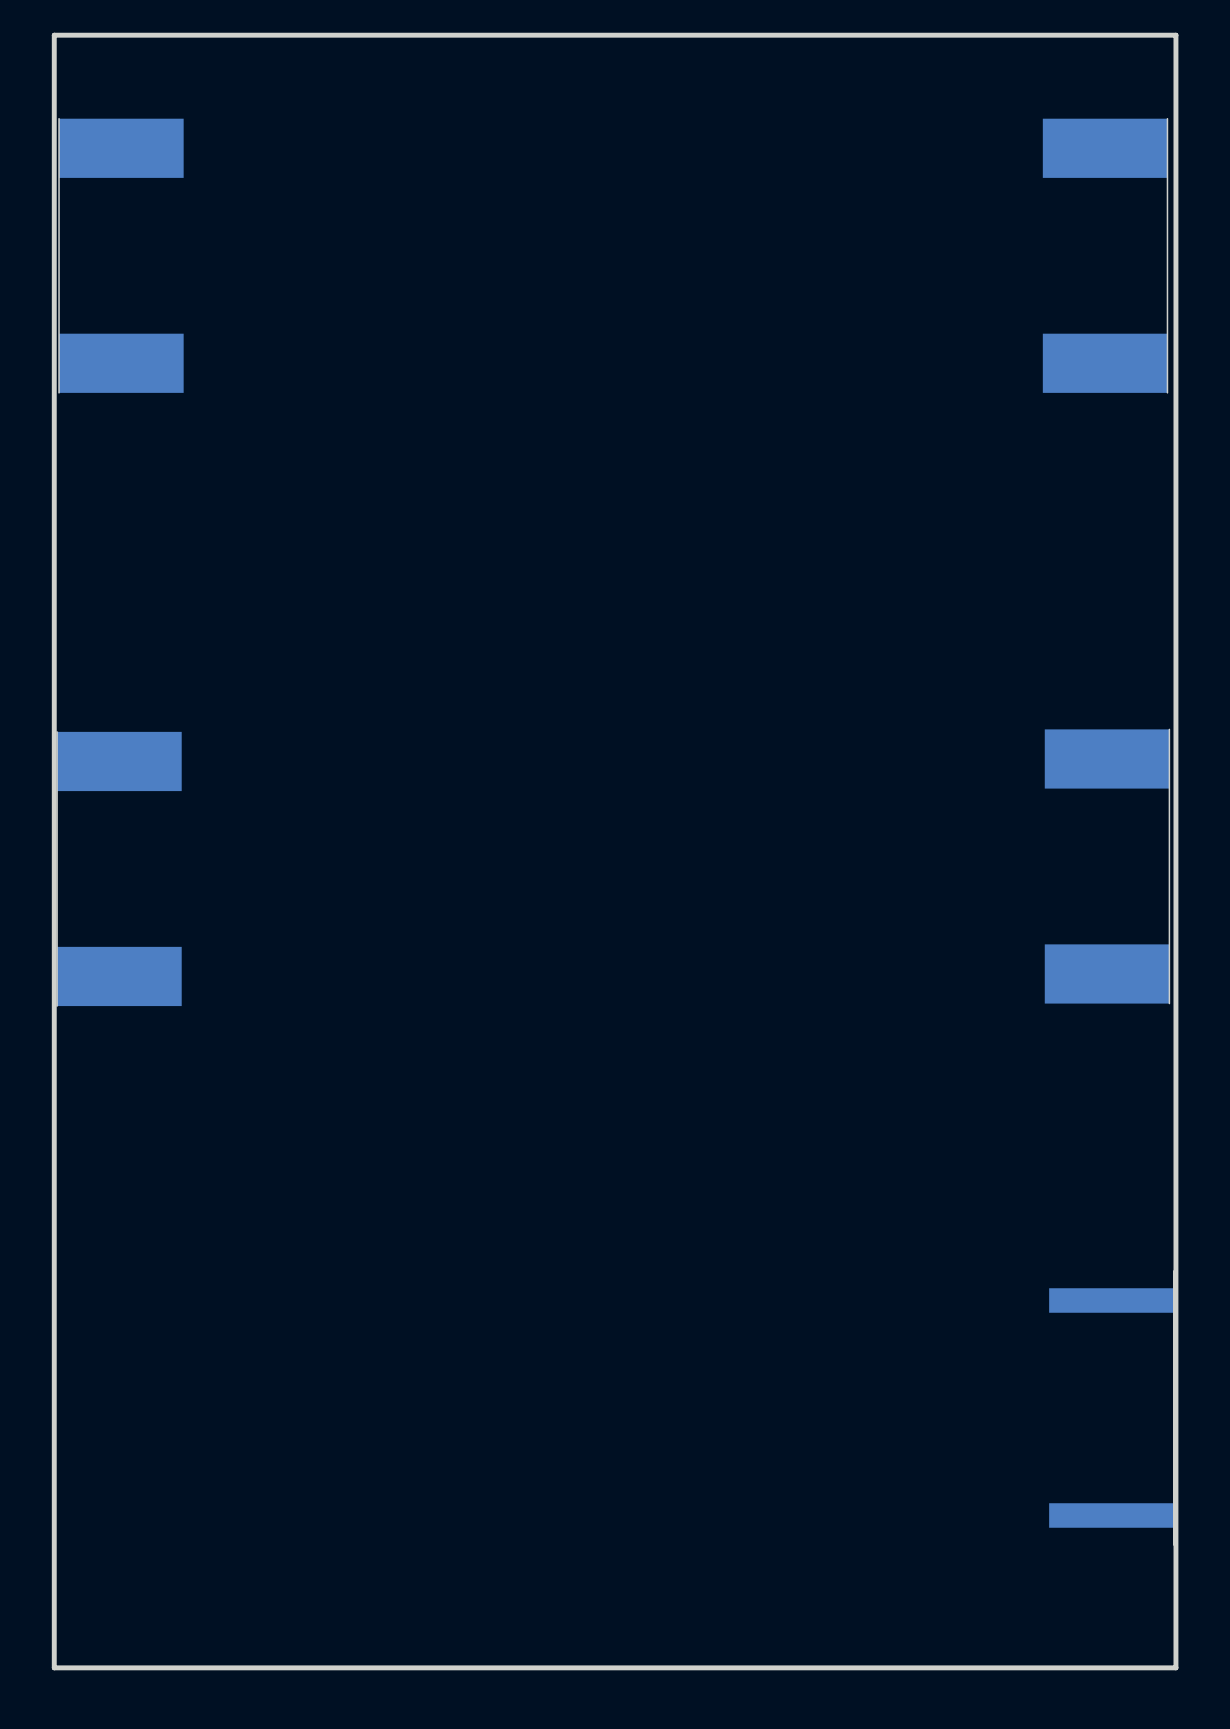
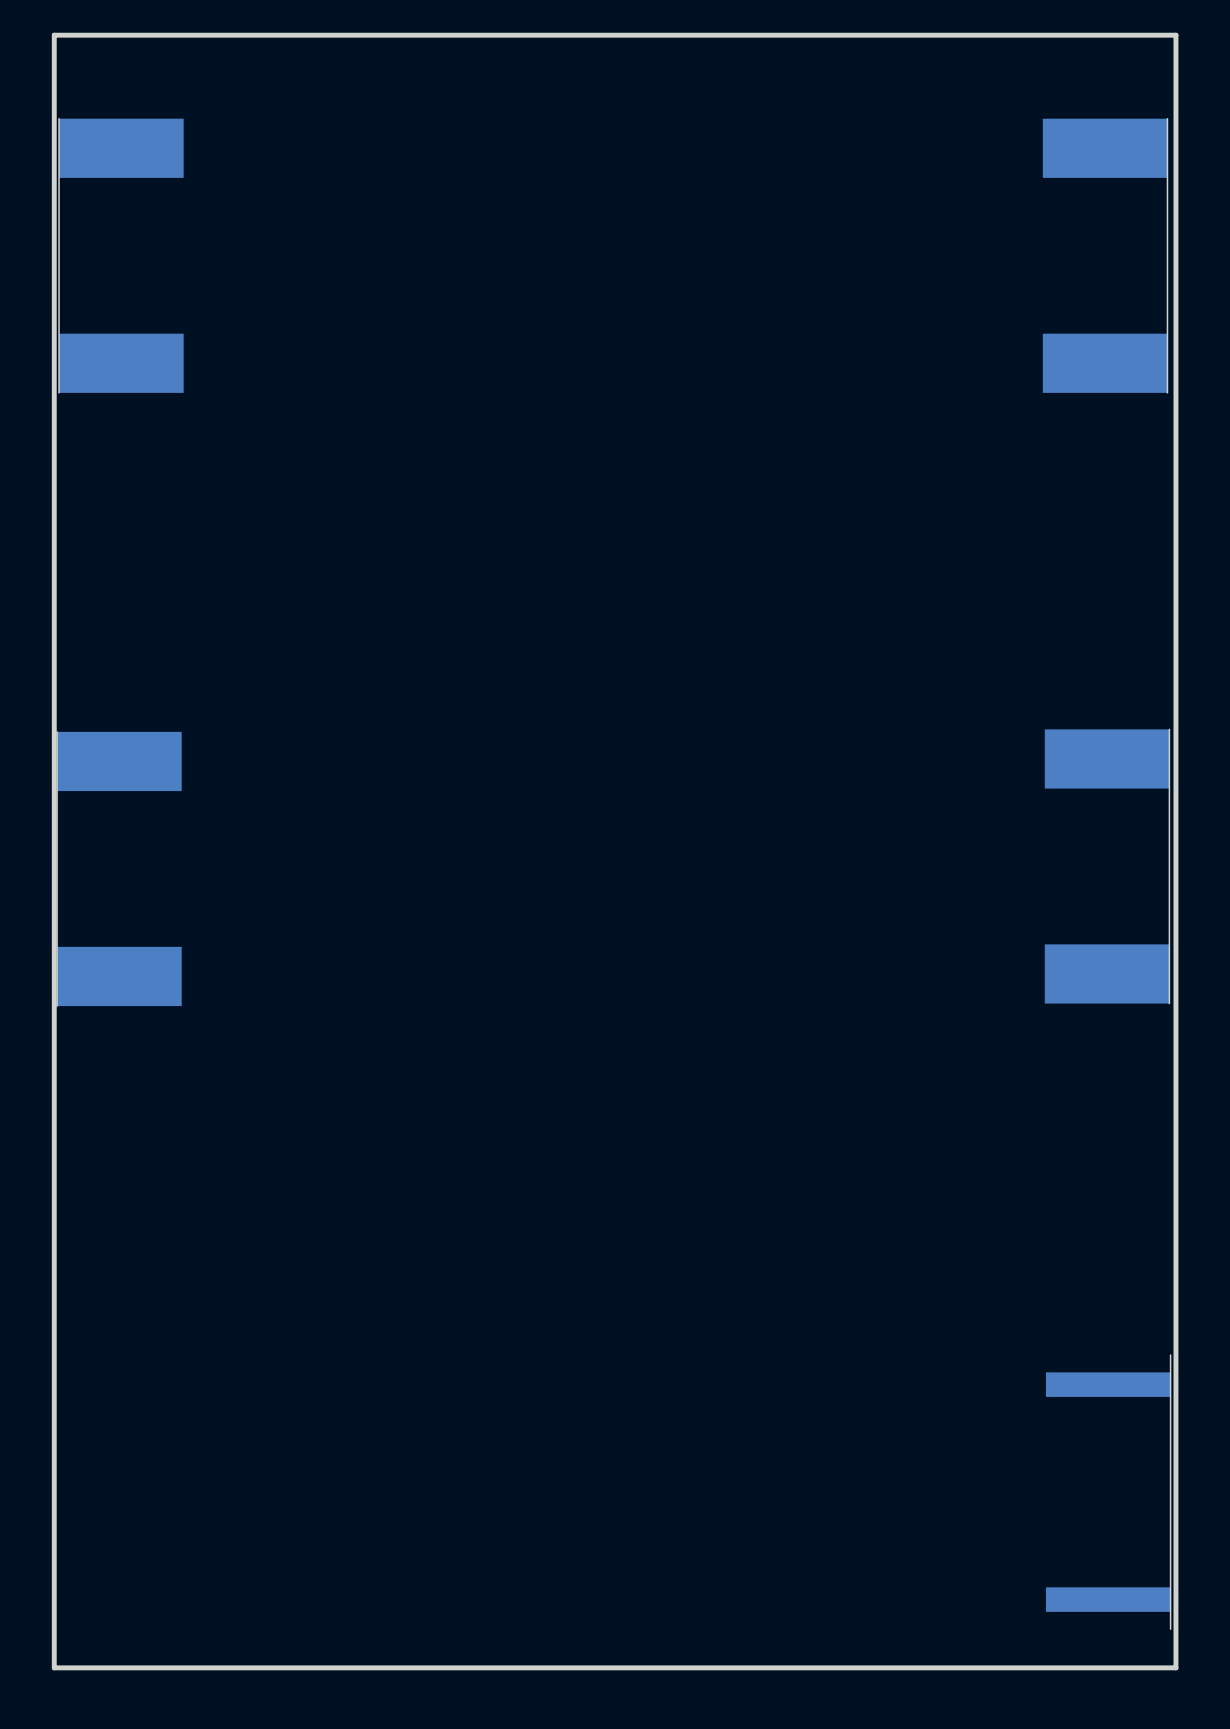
part position: (1111, 1408) -> (1108, 1492)

